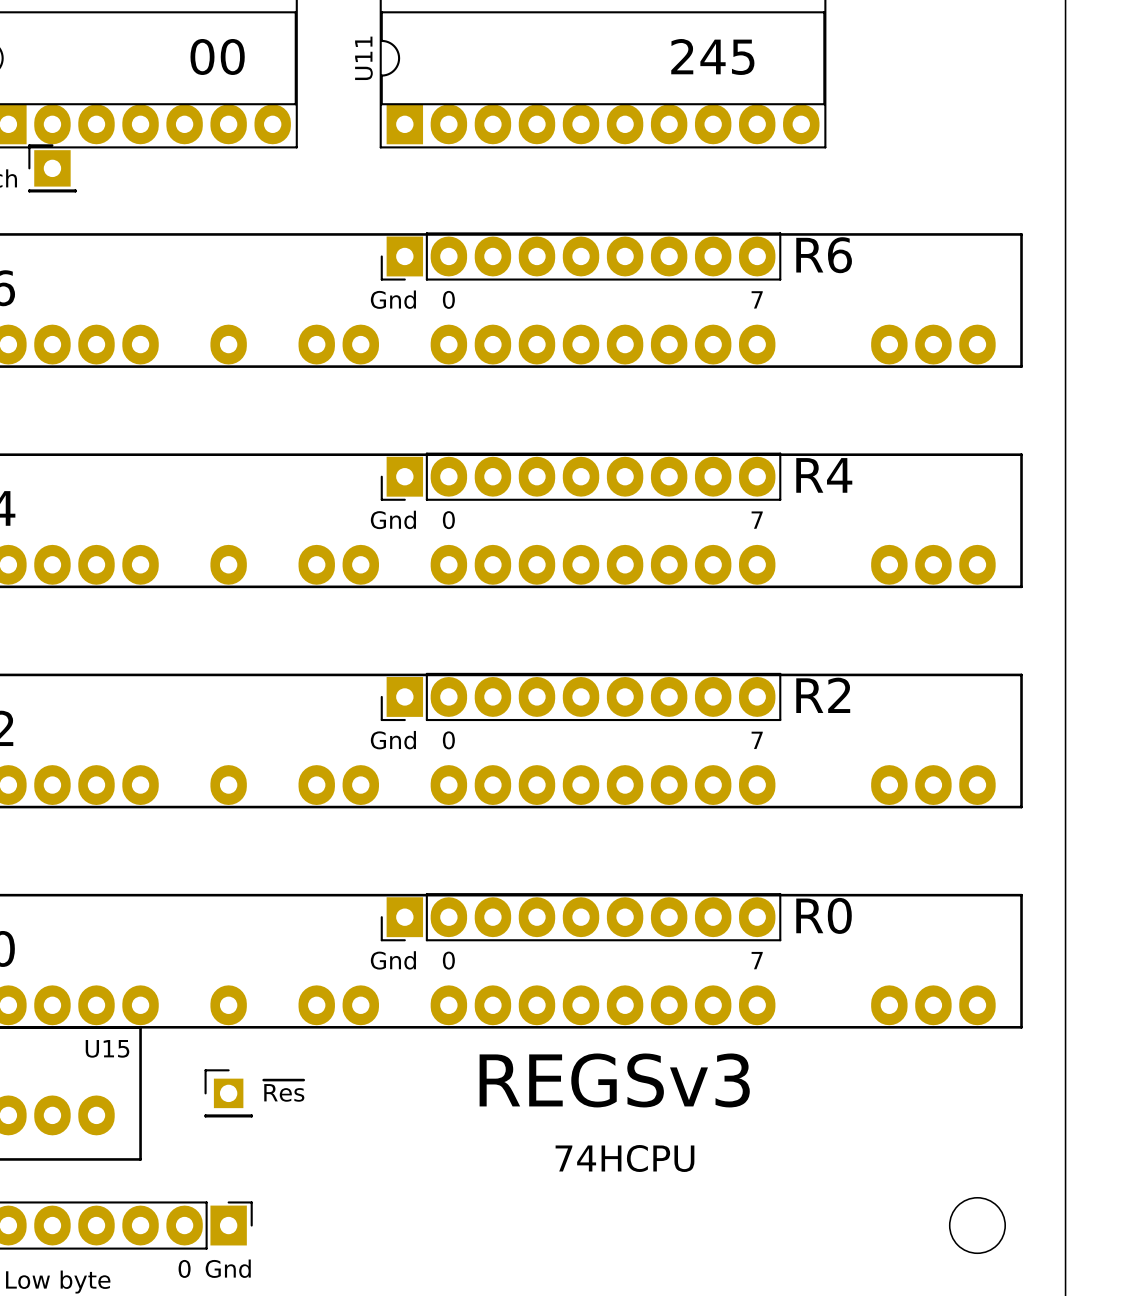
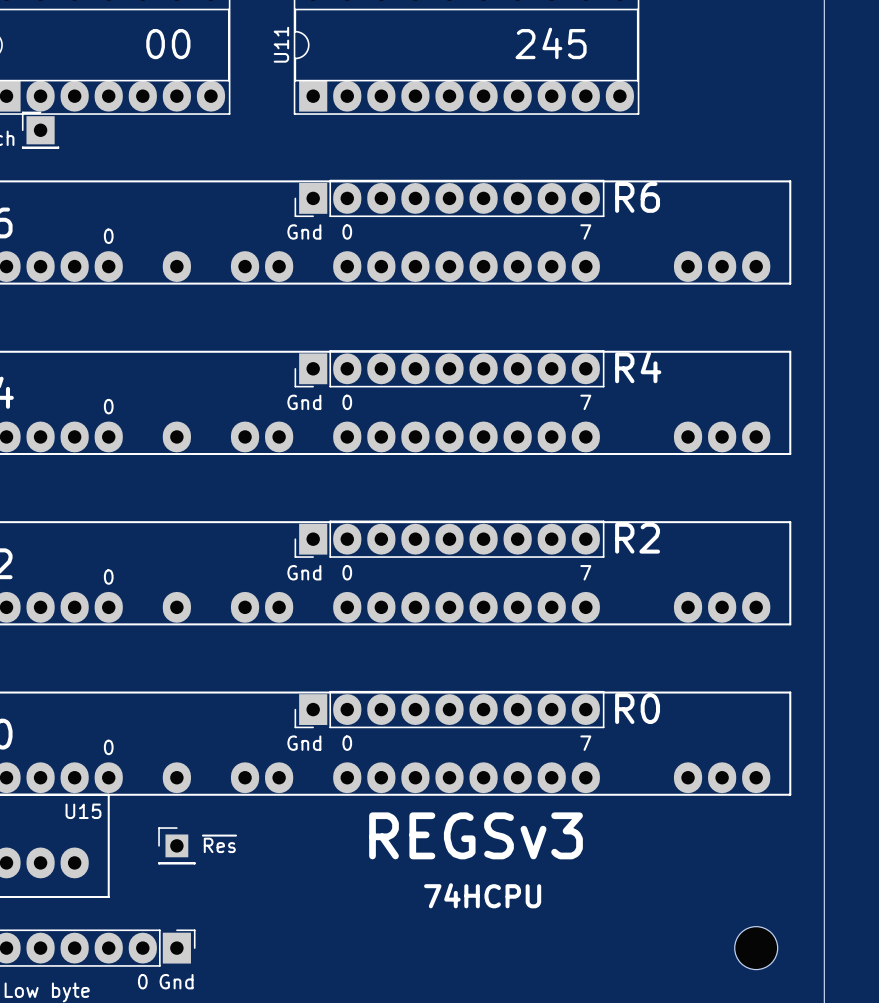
text: none -> 0 (108, 236)
text: none -> 0 (108, 406)
text: none -> 0 (108, 577)
text: none -> 0 (108, 747)

